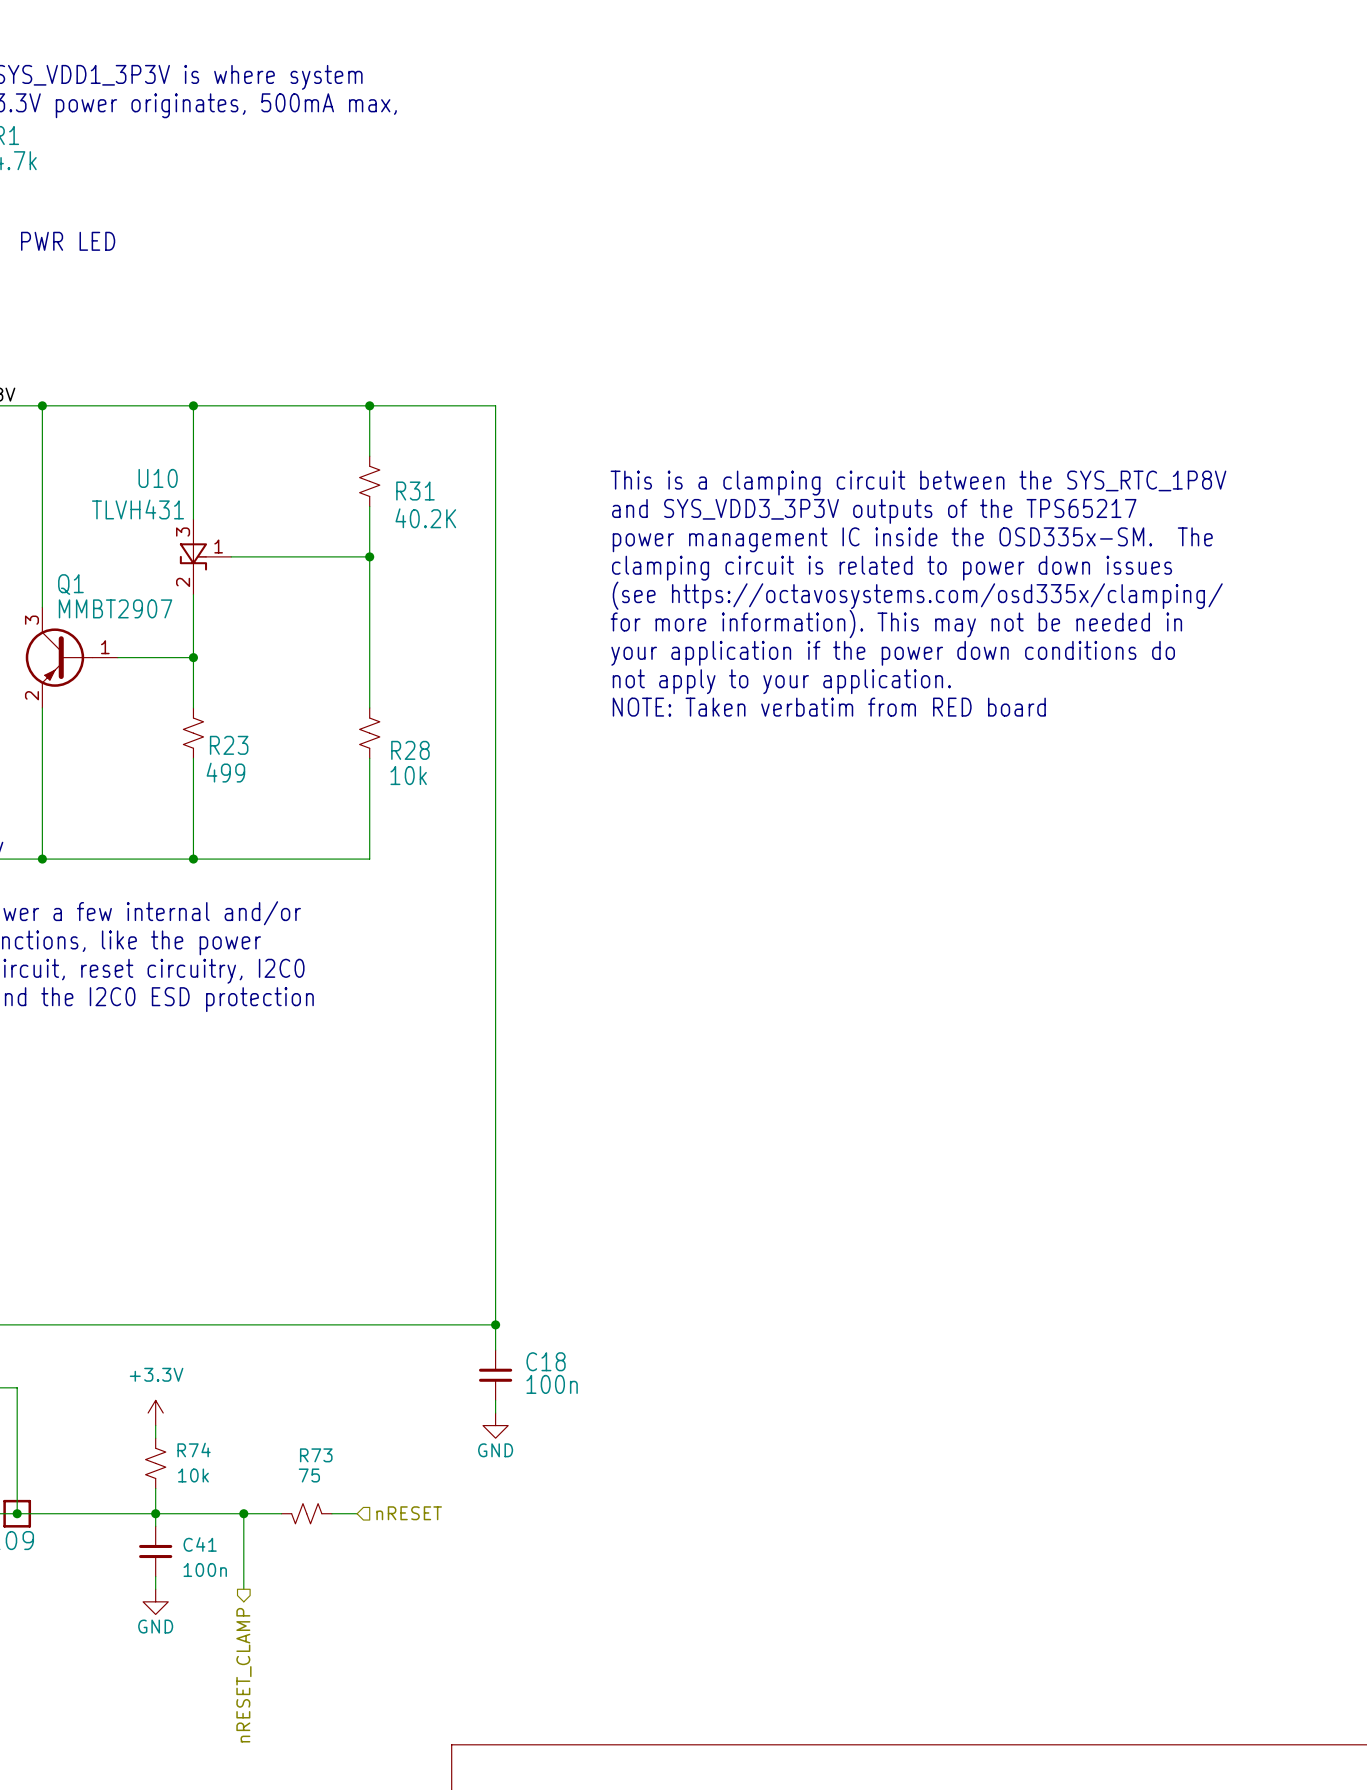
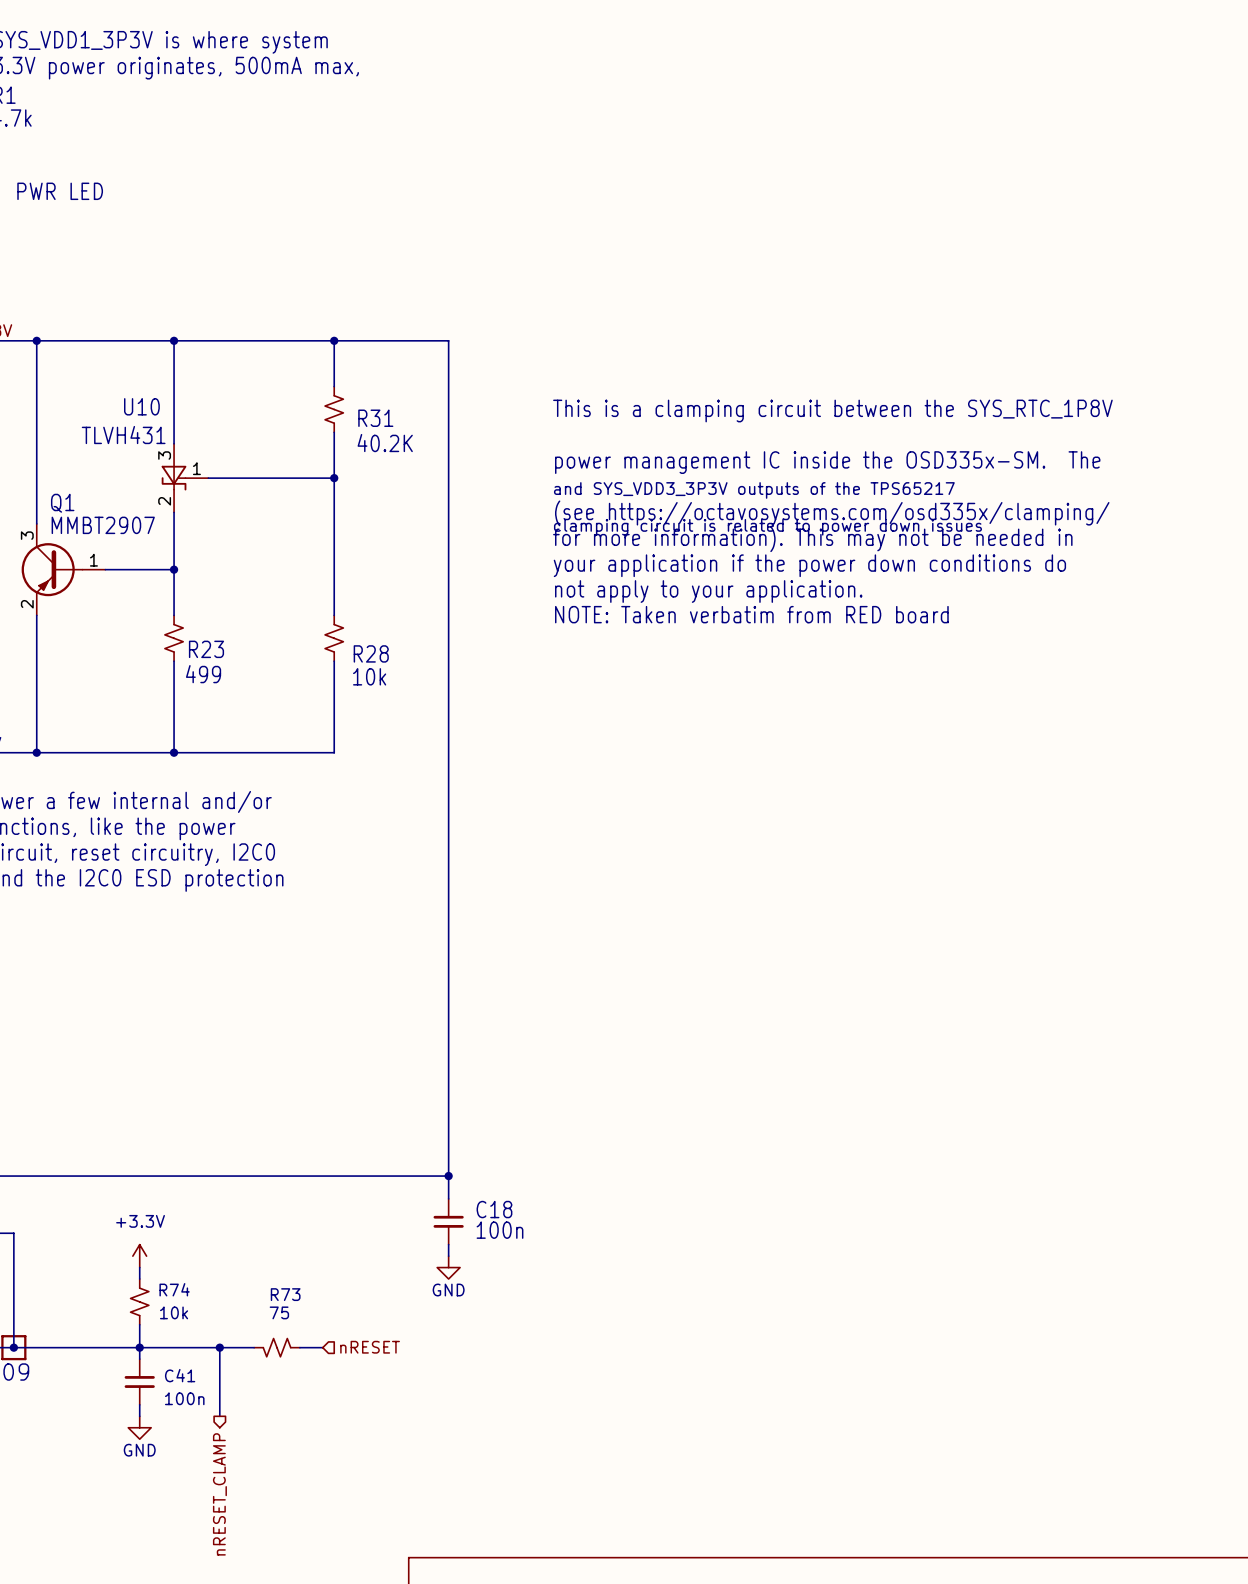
text: and SYS_VDD3_3P3V outputs of the TPS65217 (874, 511) -> none
text: clamping circuit is related to power down issues (892, 568) -> and SYS_VDD3_3P3V outputs of the TPS65217 (754, 490)
text: none -> clamping circuit is related to power down issues (767, 527)

